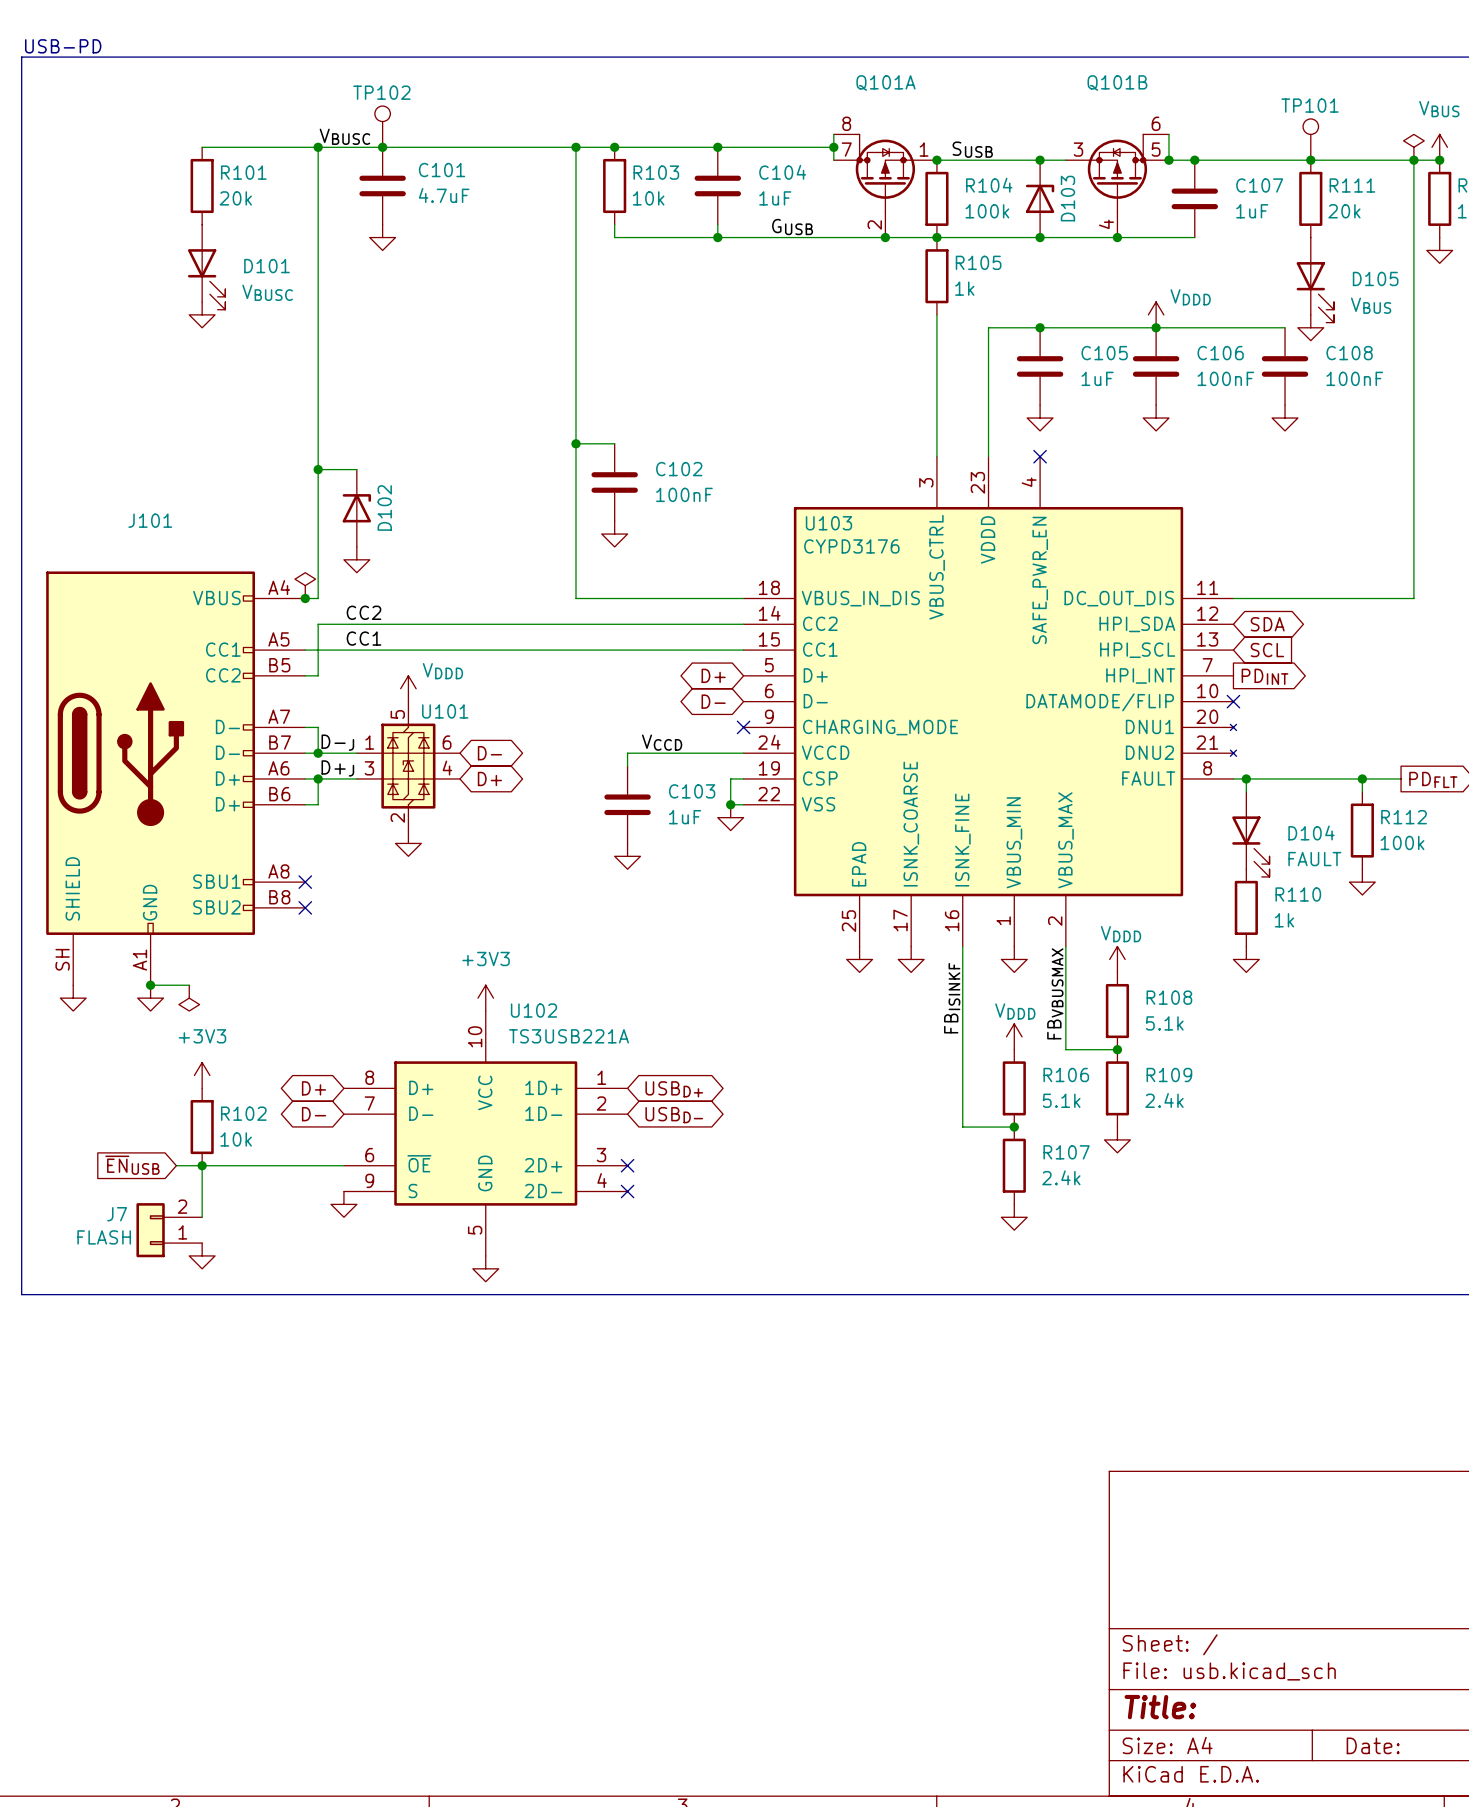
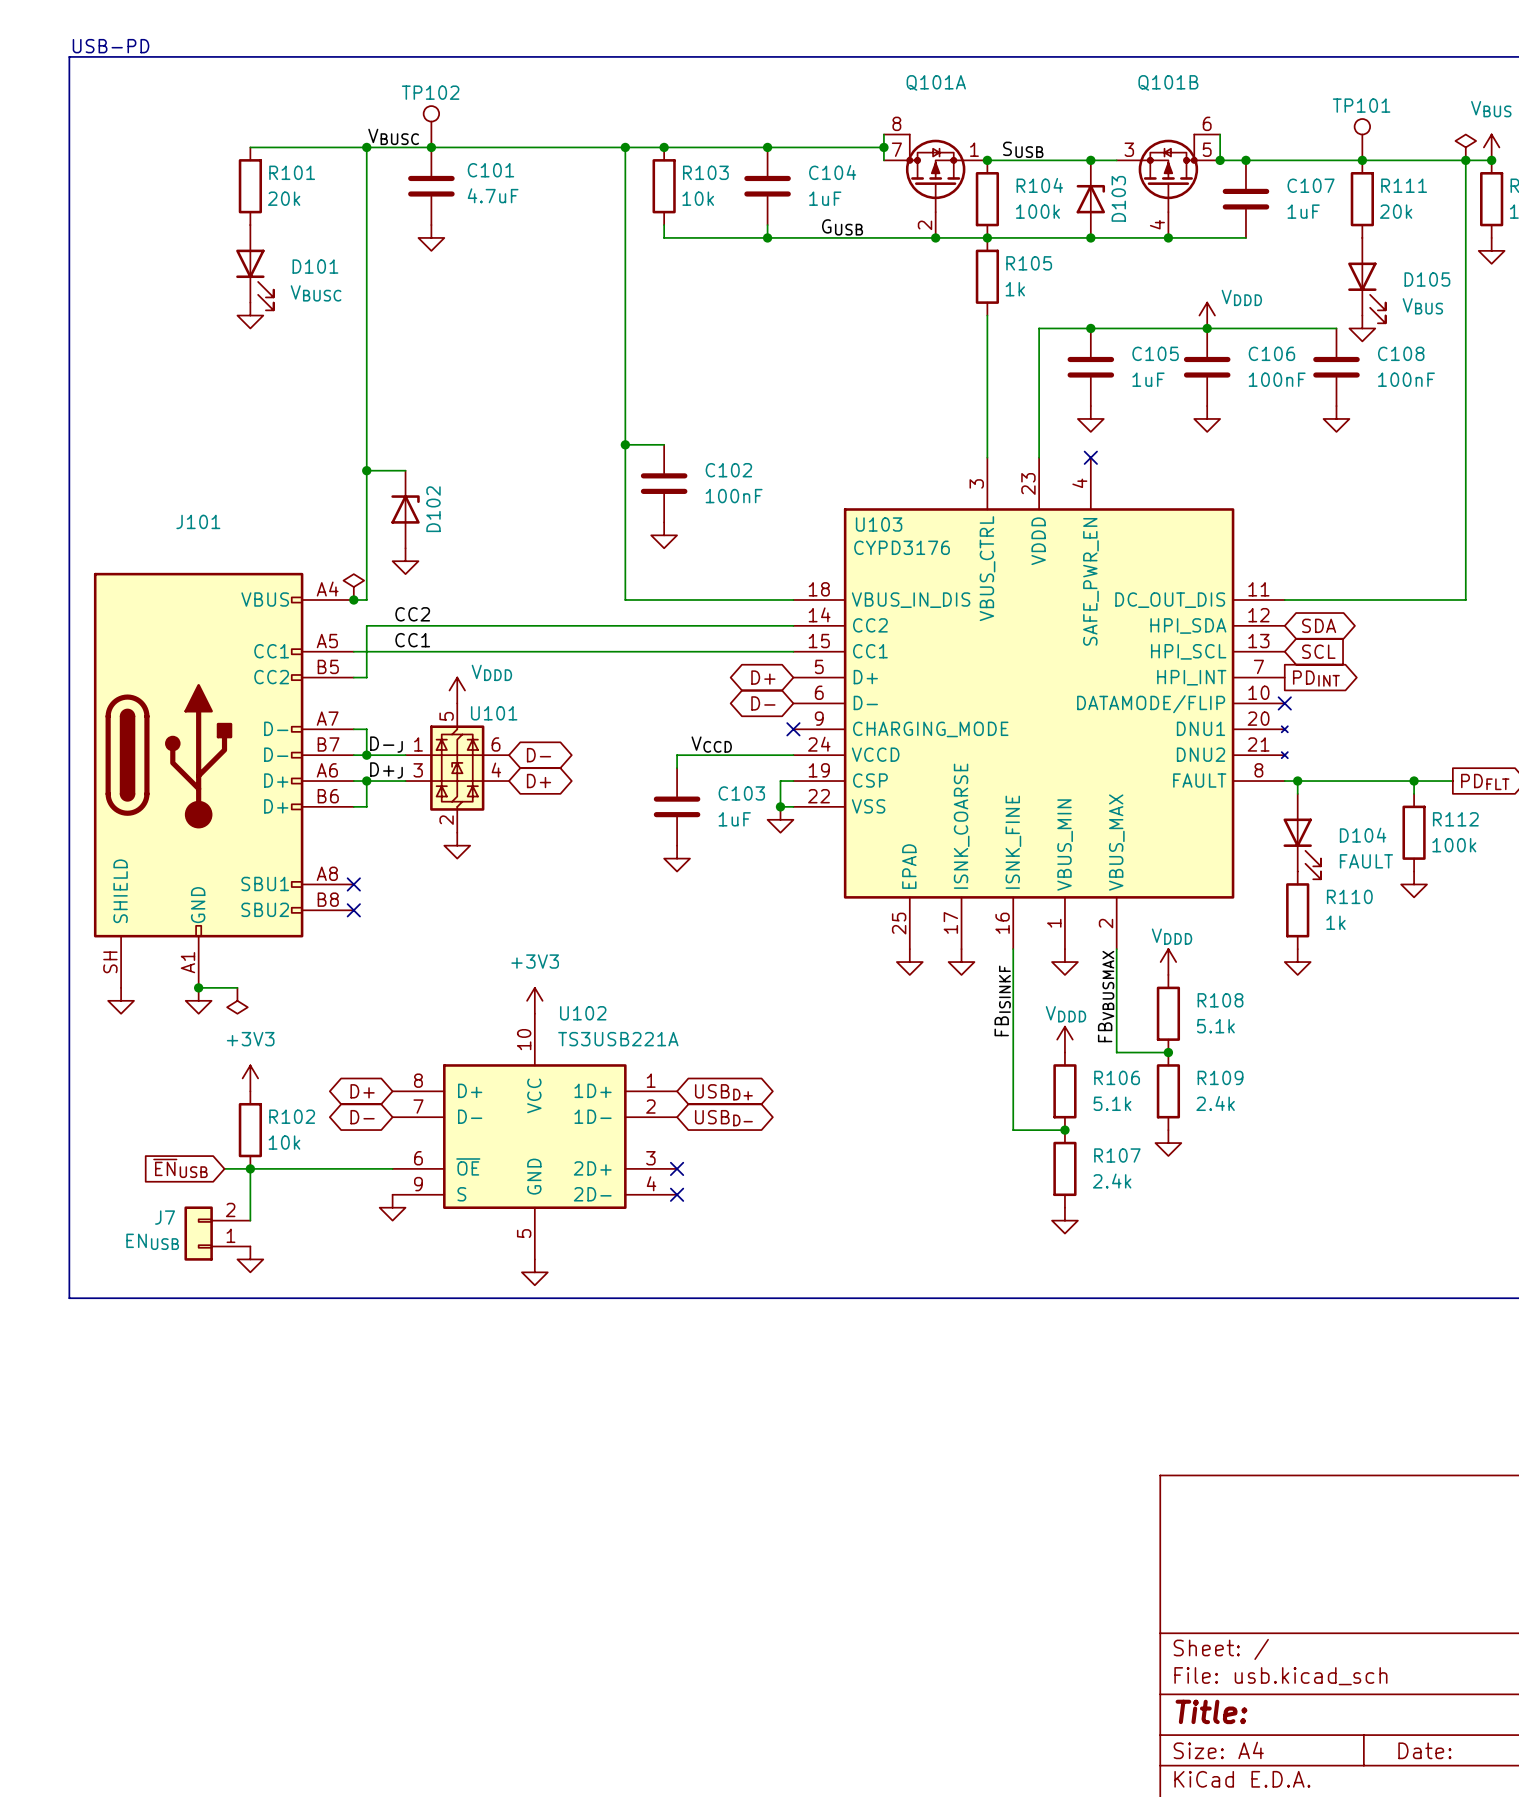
J7 value: FLASH (104, 1237) -> ENUSB (152, 1241)

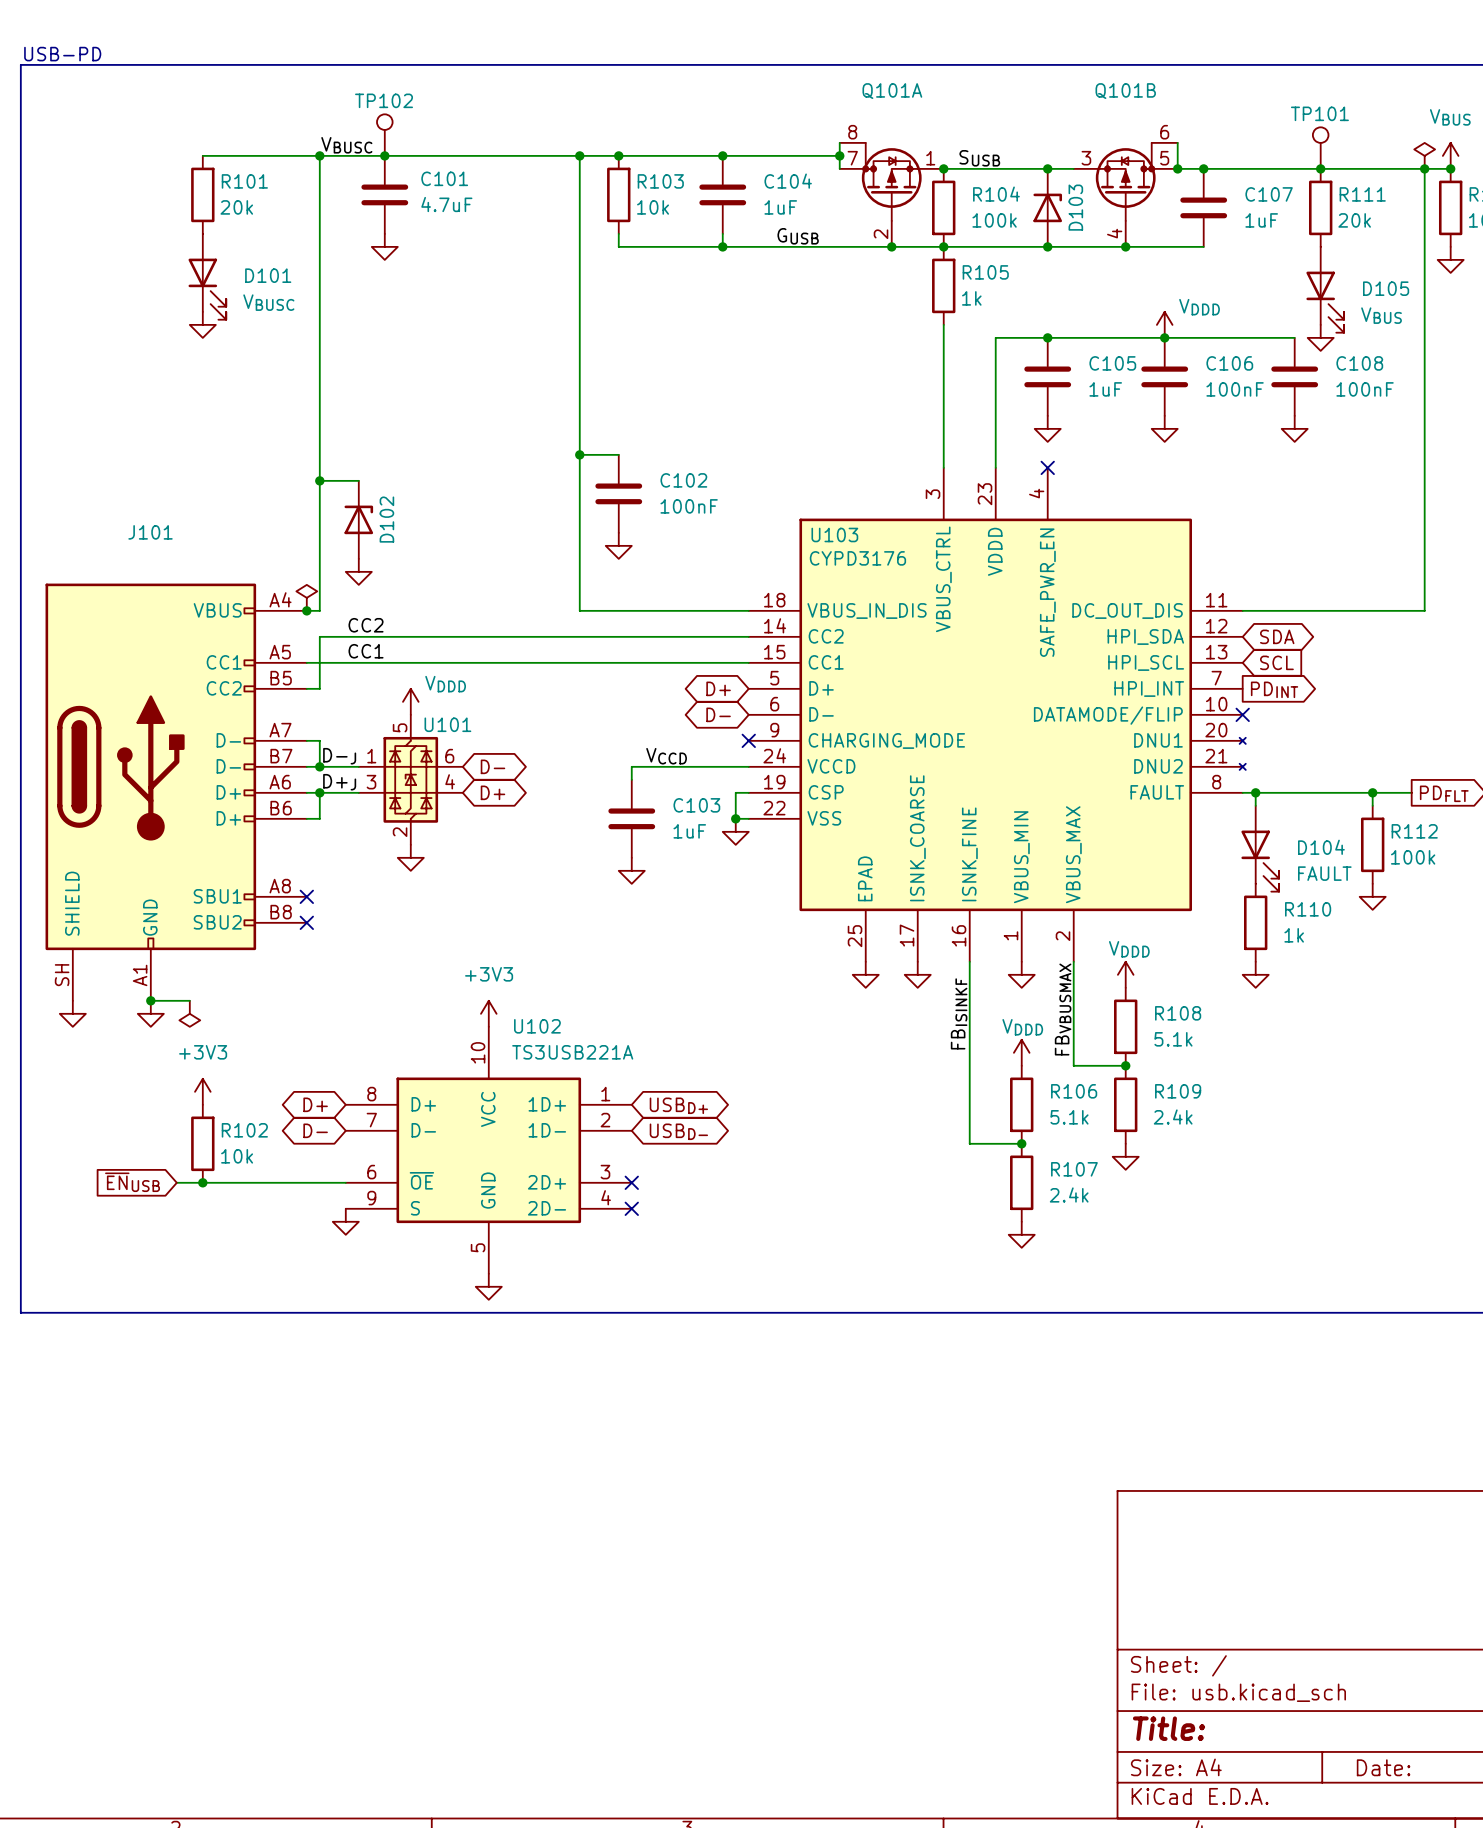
wire: (250, 1168) (250, 1220) -> none
J7: ENUSB (217, 1233) -> none
power symbol: (250, 1259) -> none

